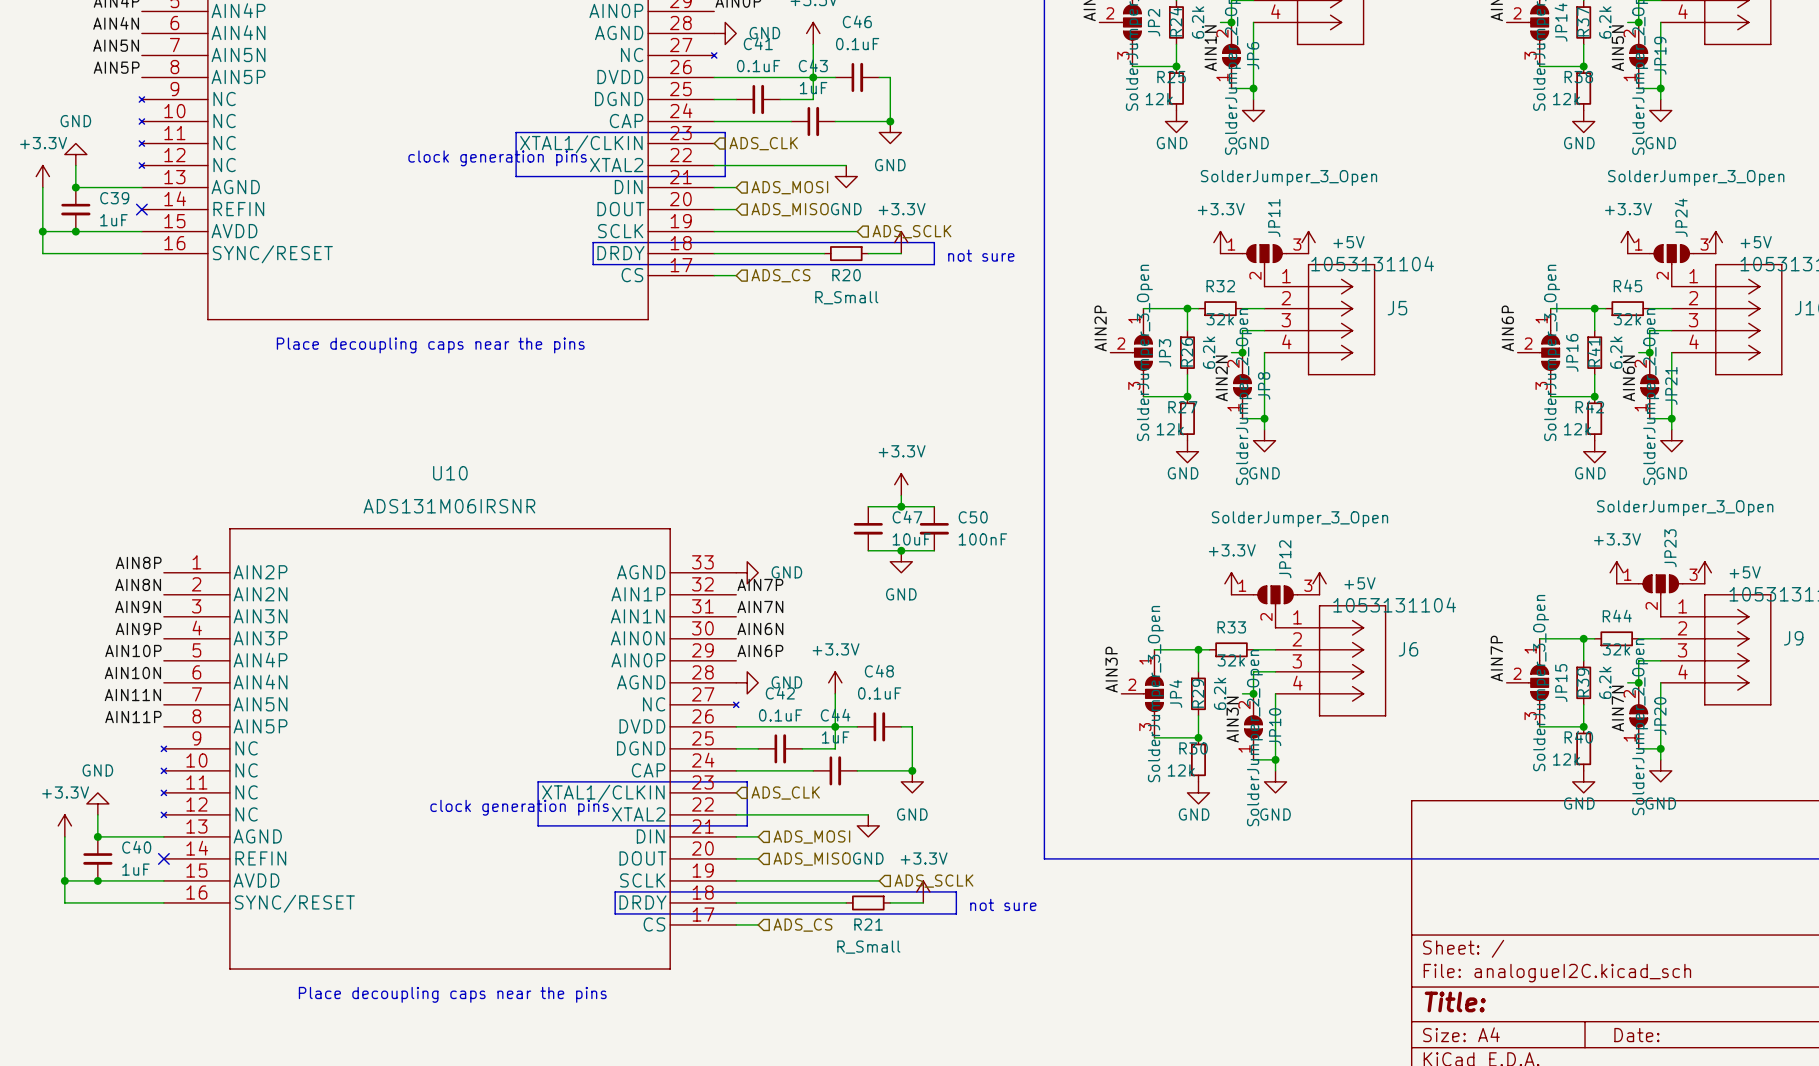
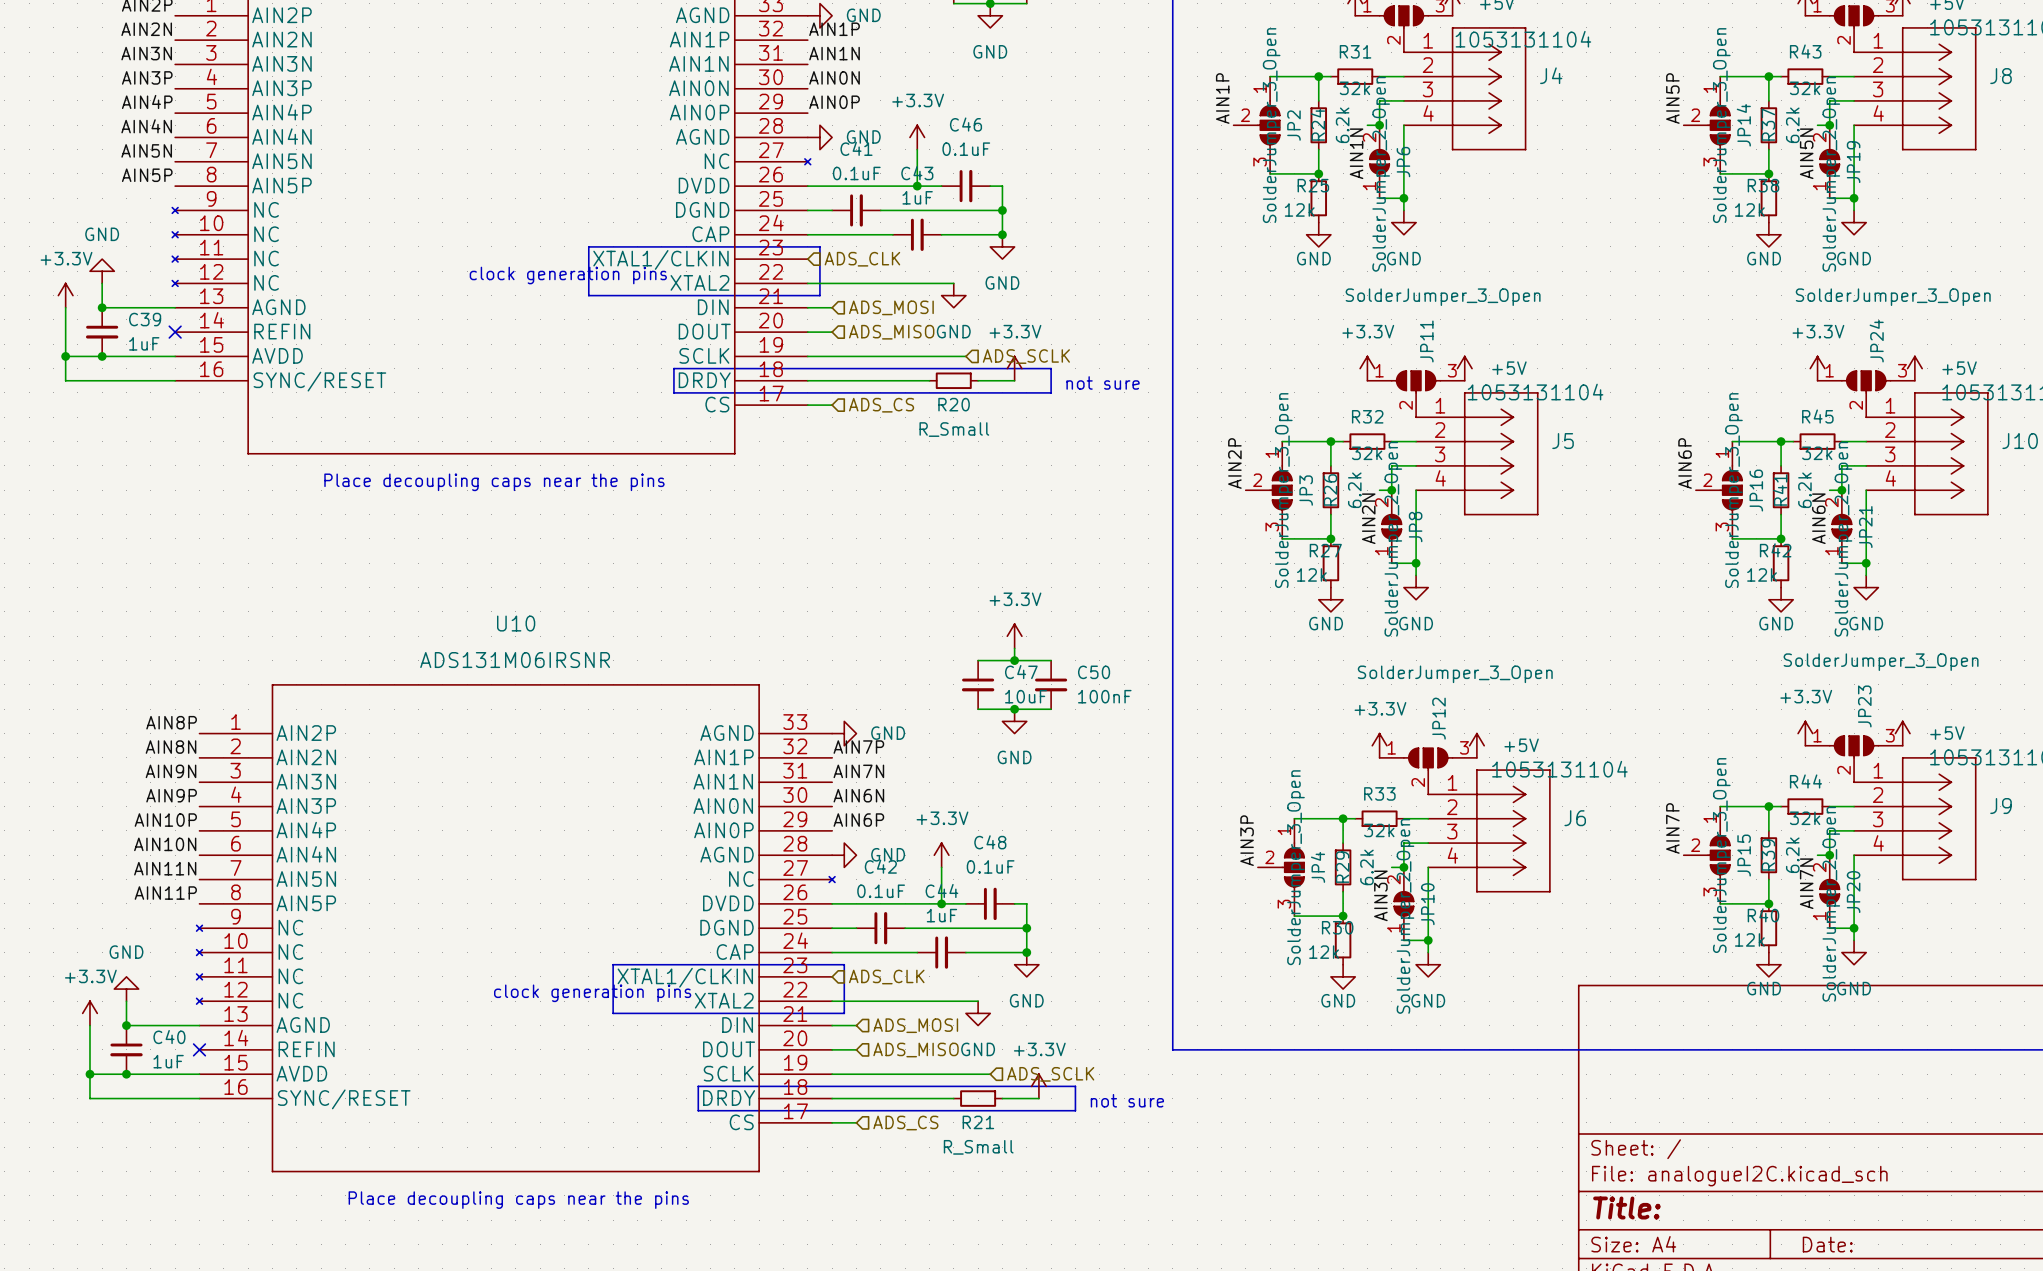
wire: (813, 77) (813, 99) -> (1002, 210) (917, 210)
junction: none -> (1002, 210)
wire: (835, 726) (835, 748) -> (1026, 928) (941, 928)
junction: none -> (1026, 928)

